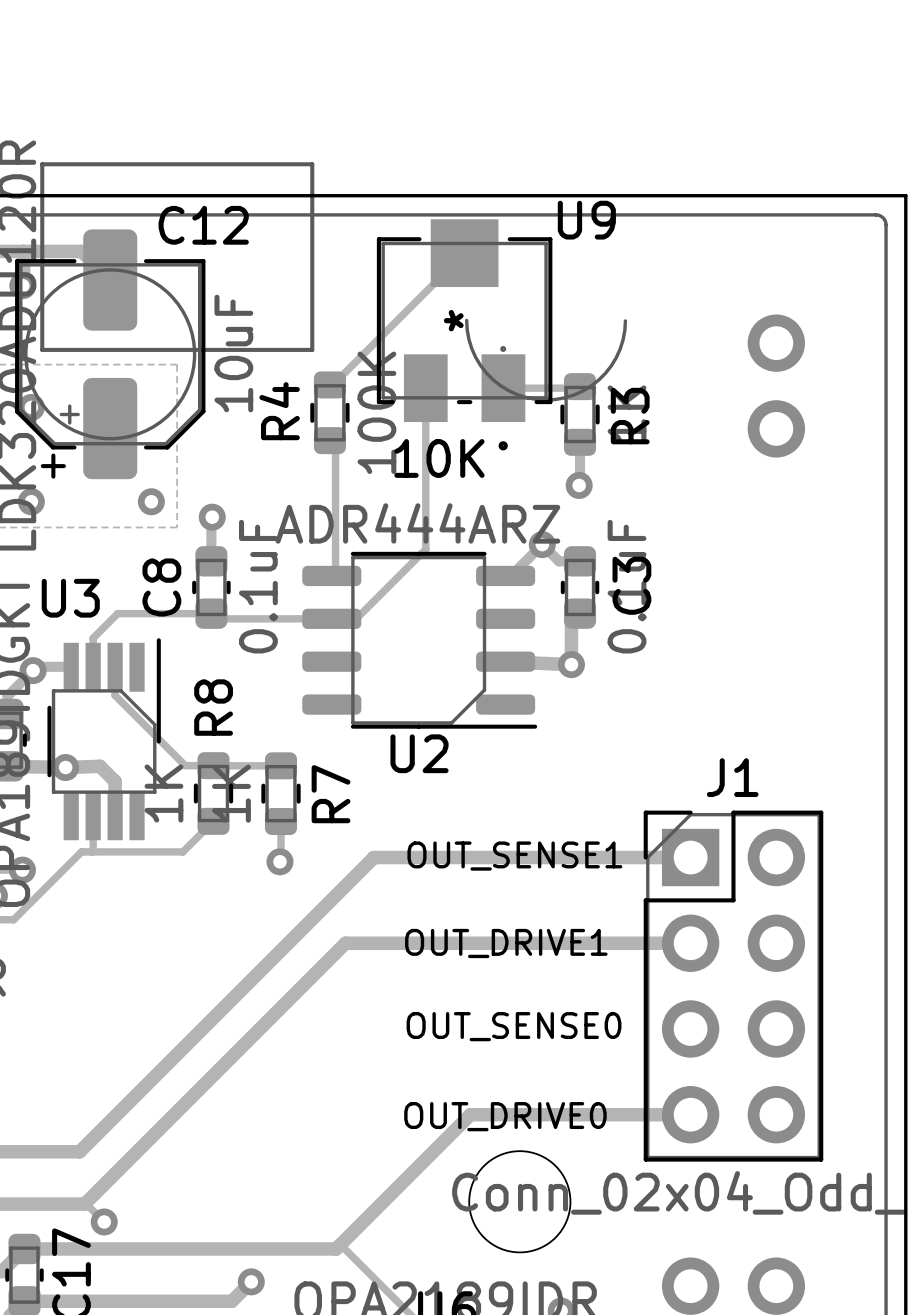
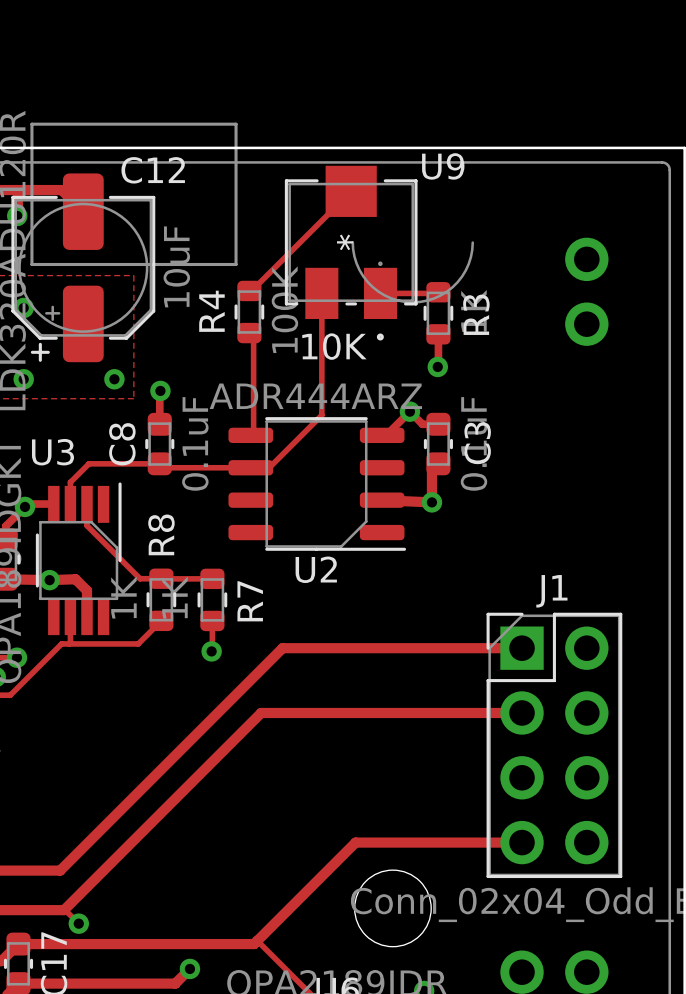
text: OUT_SENSE1 (514, 856) -> none
text: OUT_DRIVE1 (506, 943) -> none
text: OUT_SENSE0 (514, 1026) -> none
text: OUT_DRIVE0 (505, 1116) -> none

